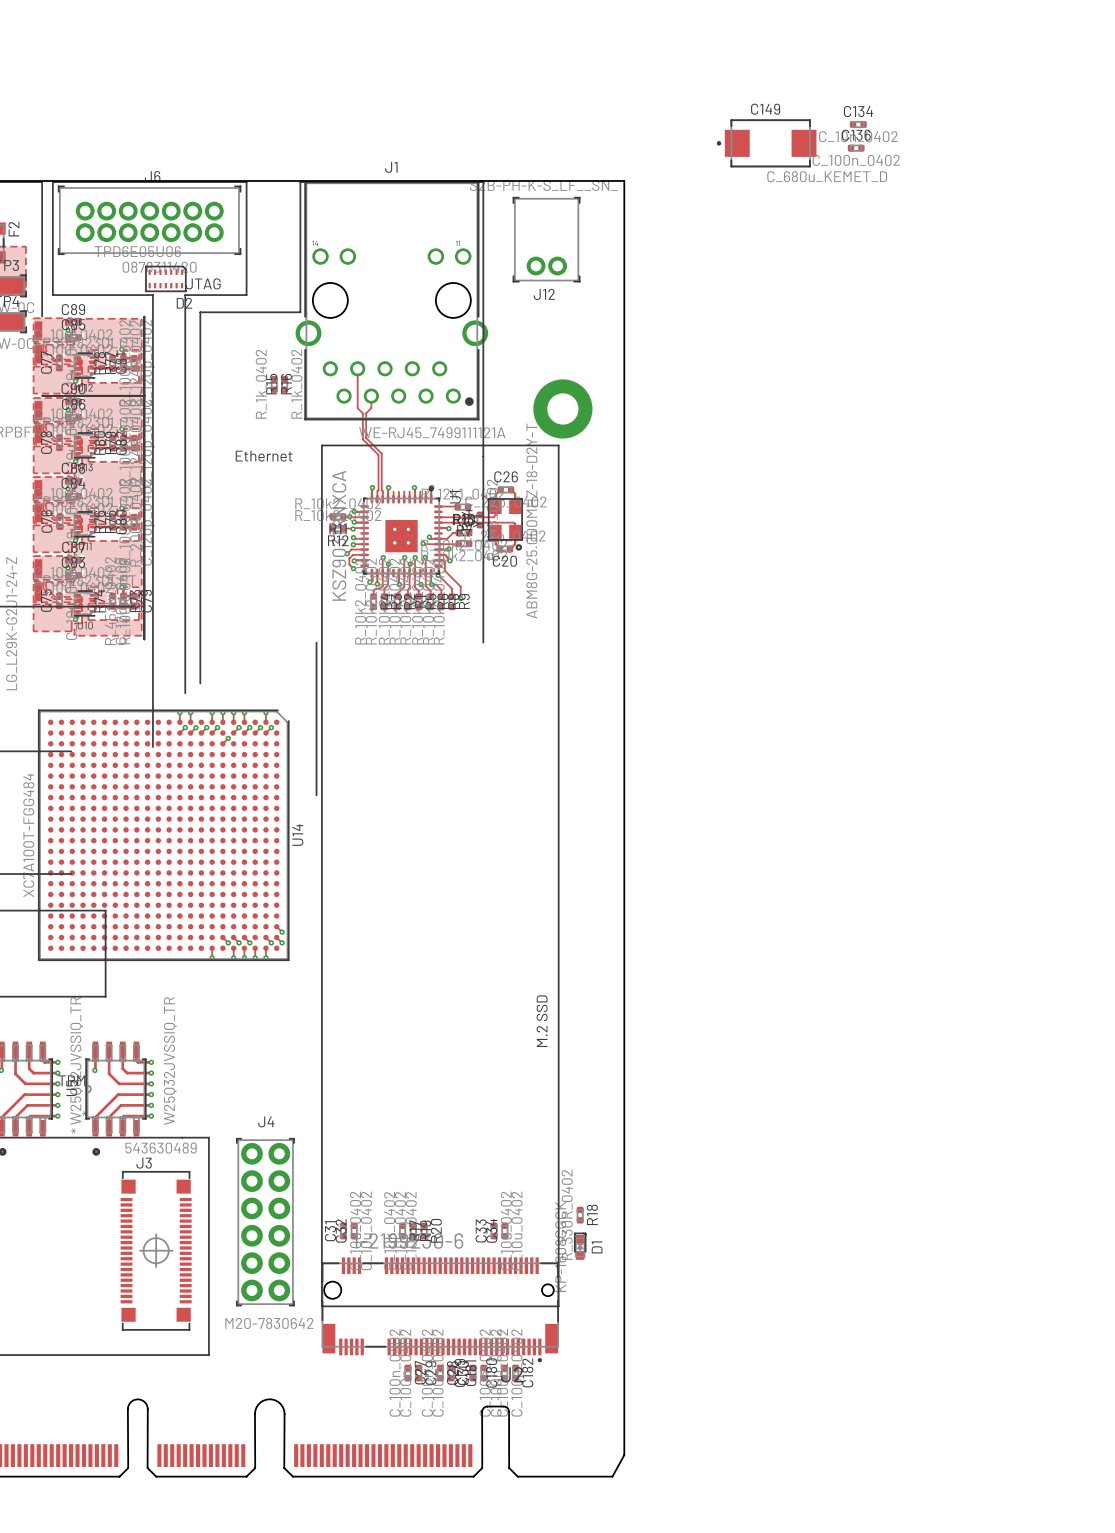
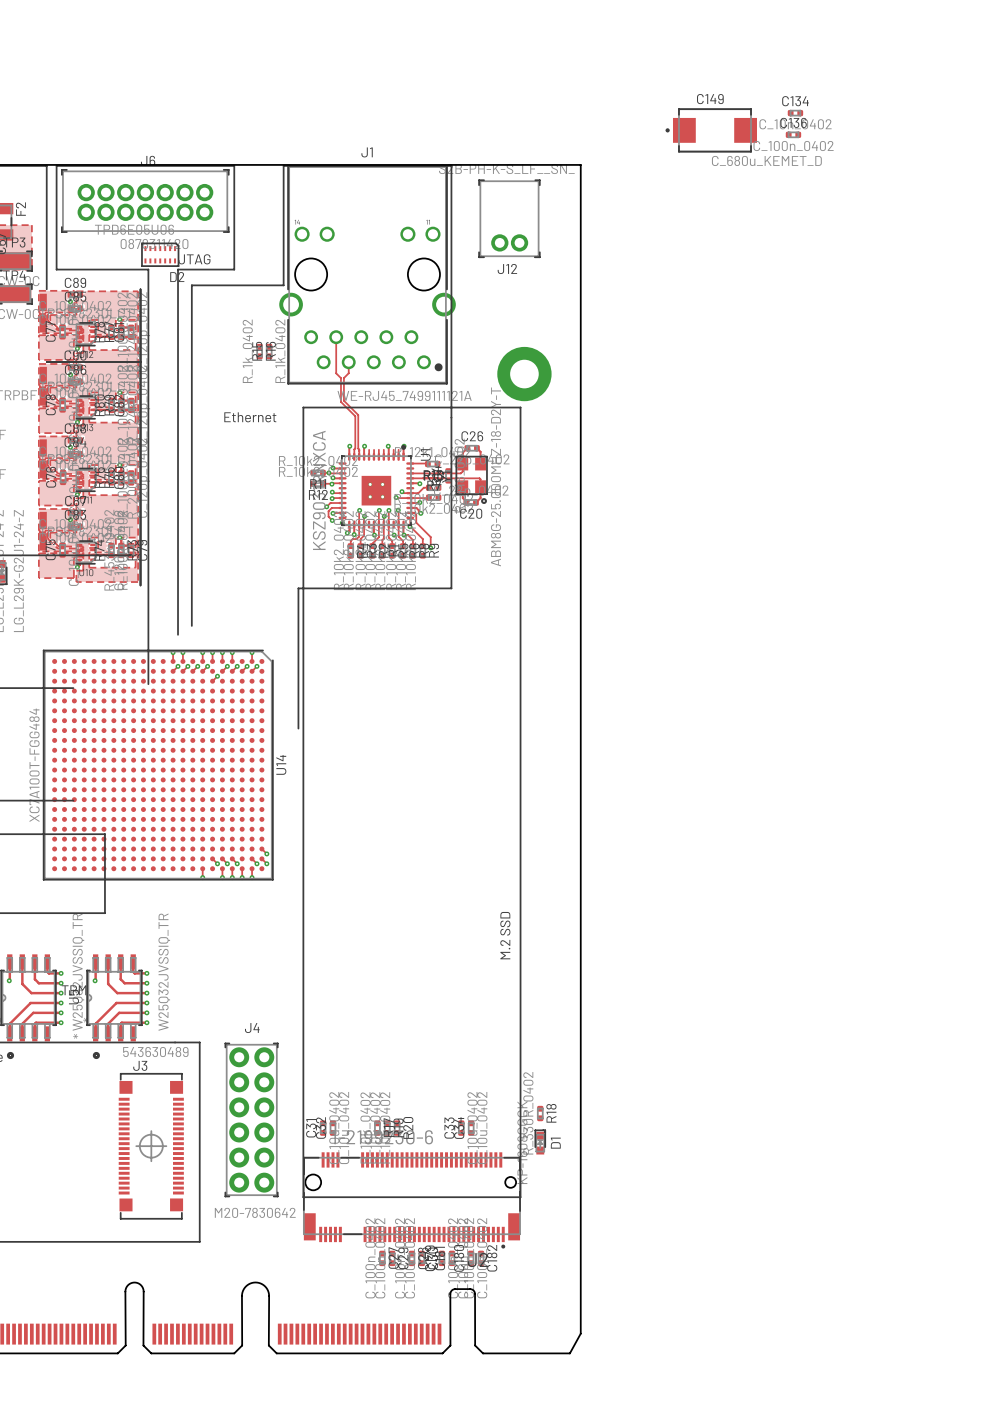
line: none -> (298, 588) (451, 588)

